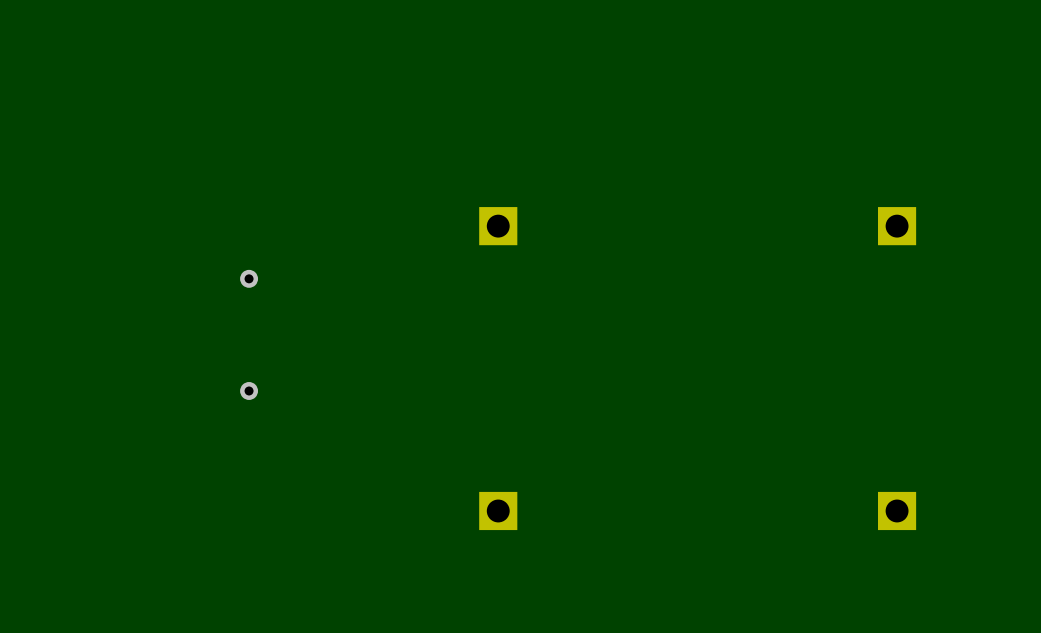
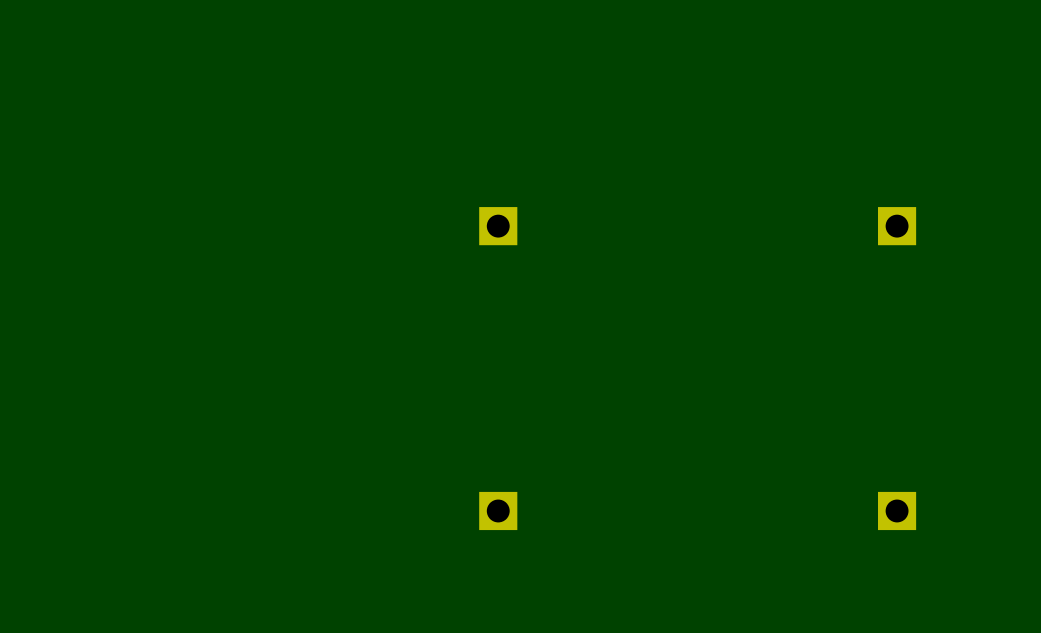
via: (249, 278) -> none
via: (249, 390) -> none

